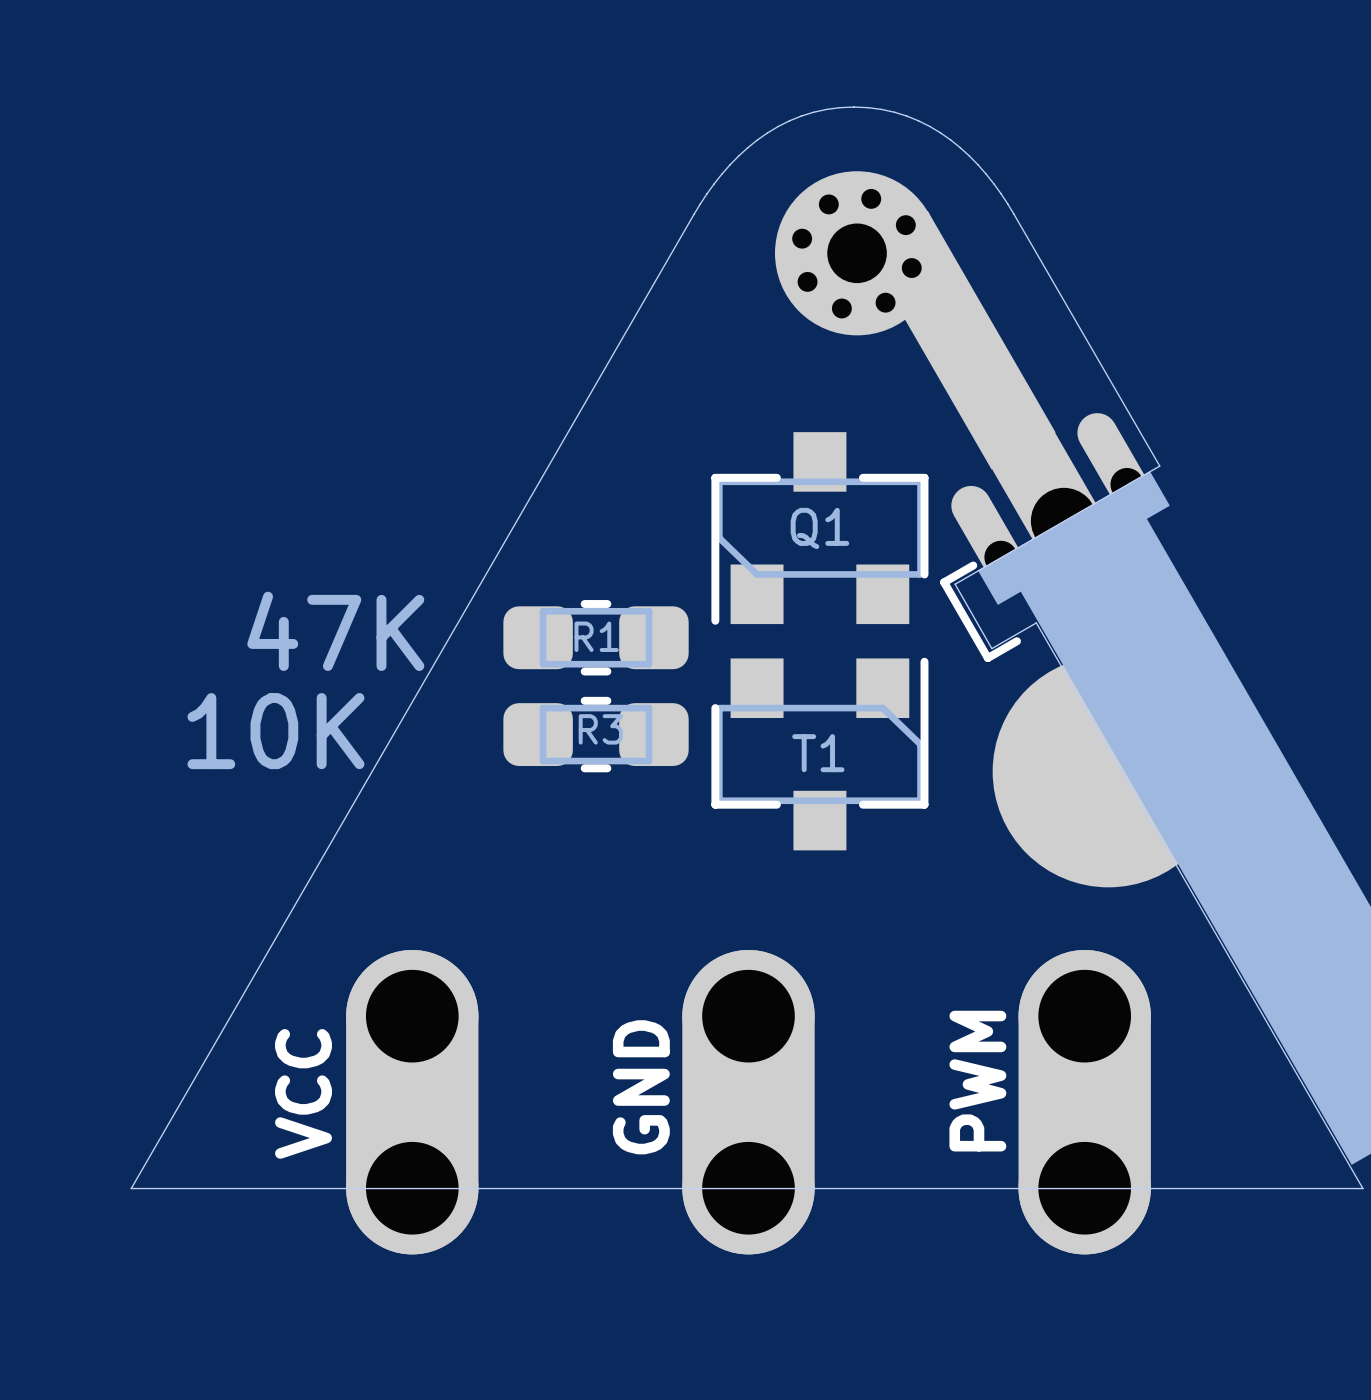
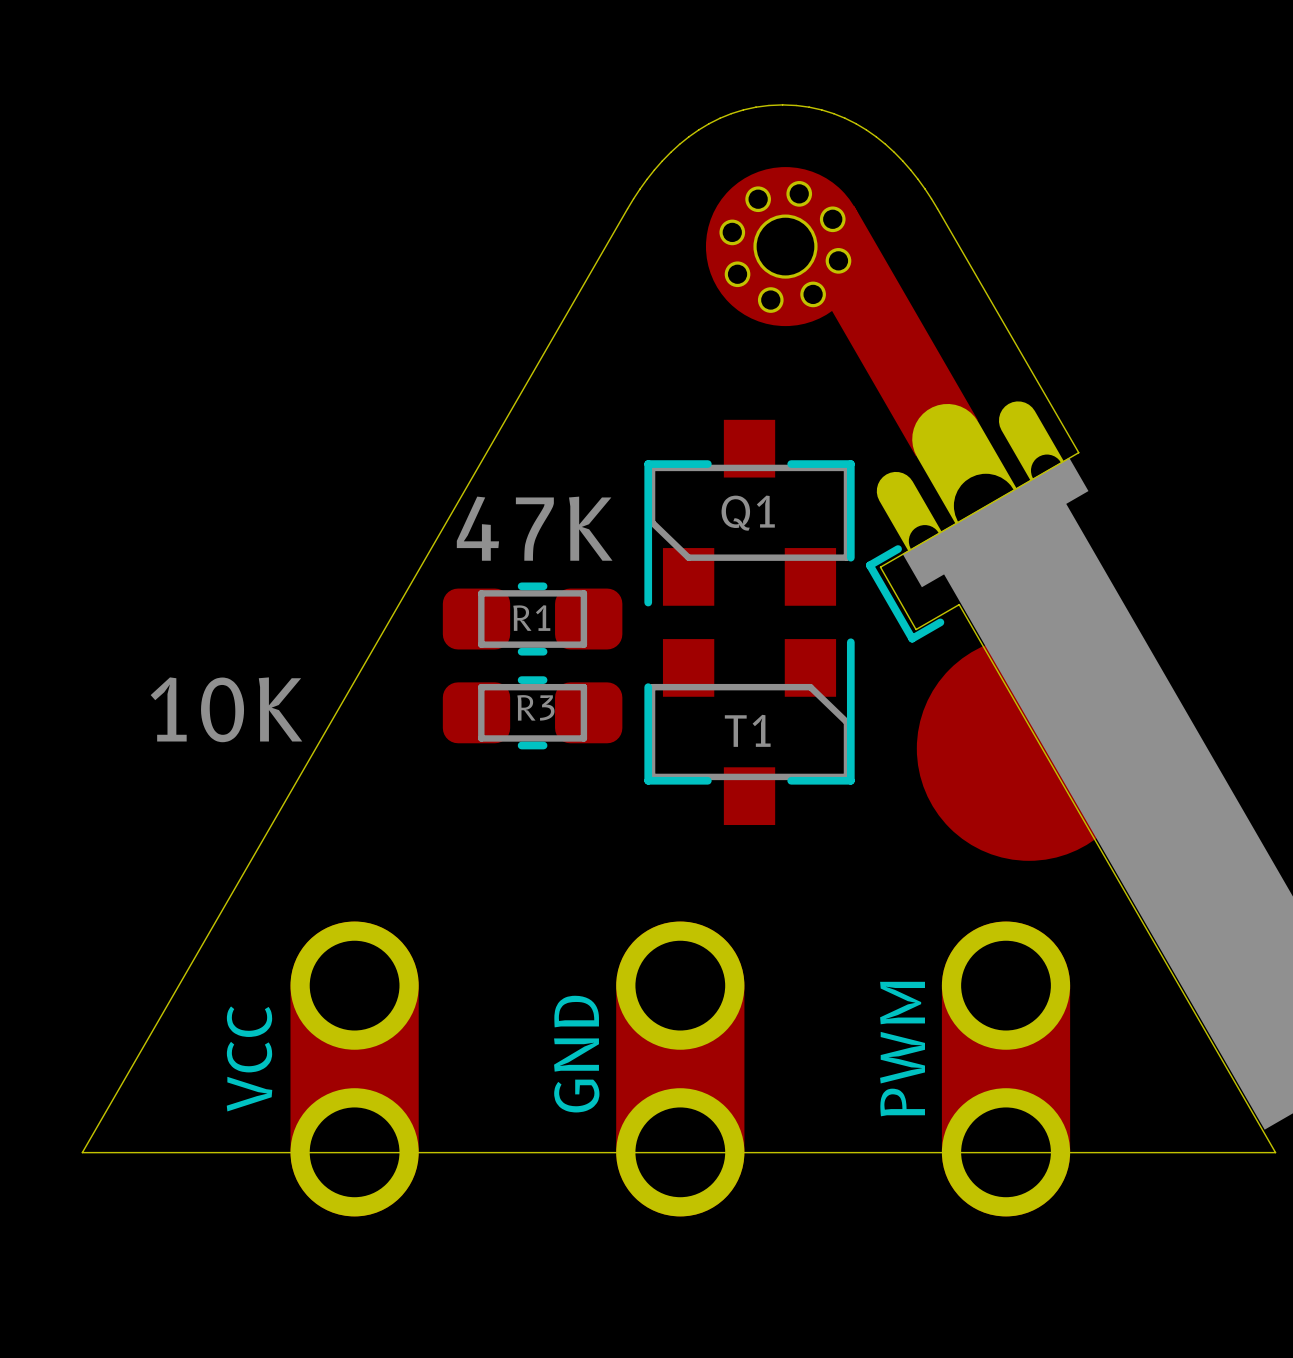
R1 value position: 47K (335, 631) -> 47K (534, 528)

